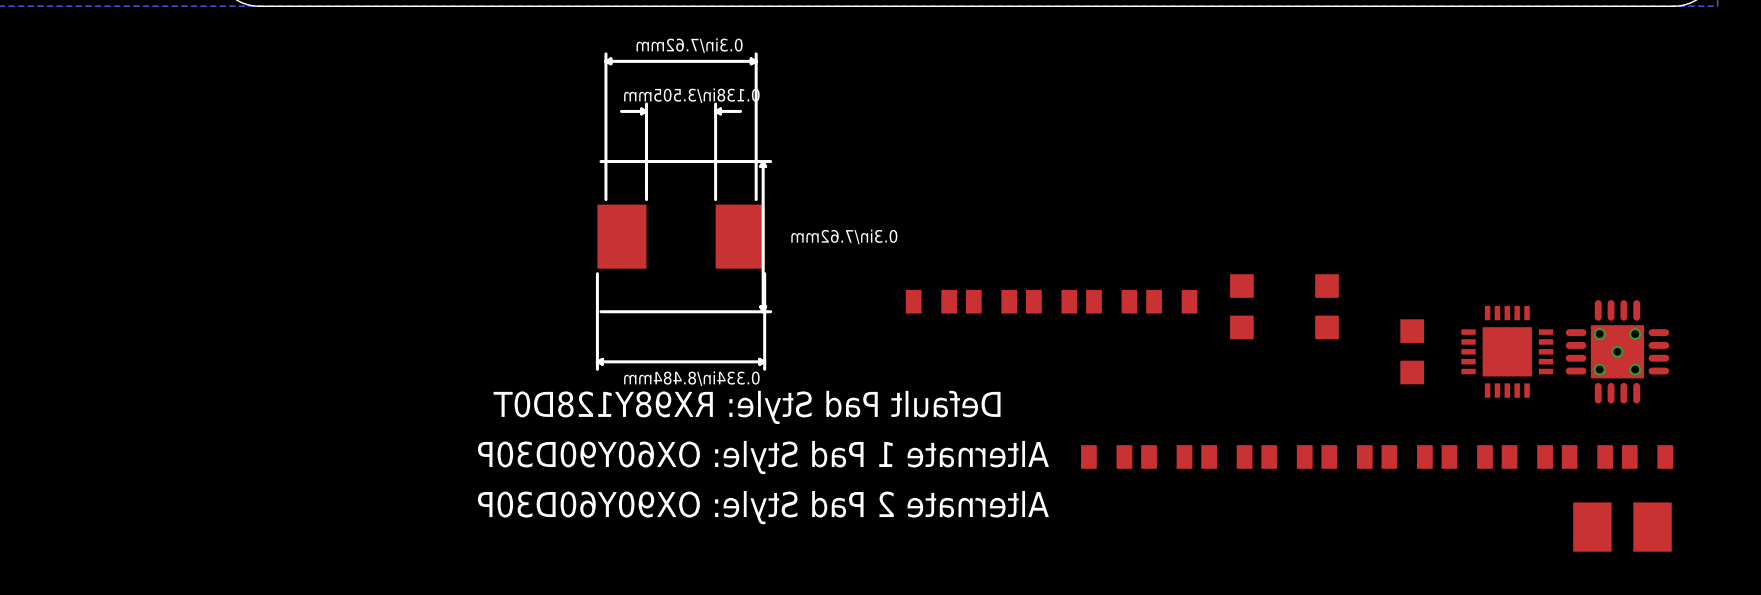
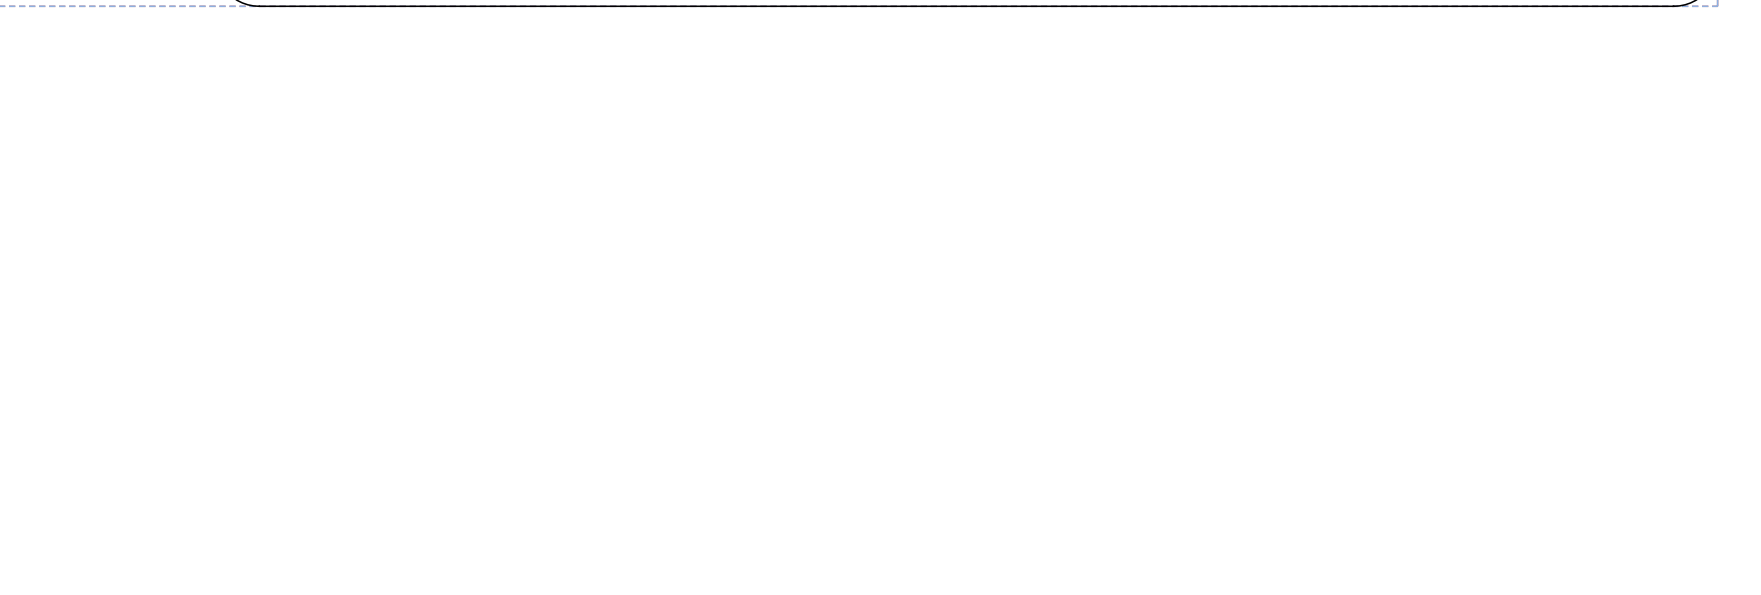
part: (684, 211) -> none
part: (931, 301) -> none
part: (991, 301) -> none
part: (1051, 301) -> none
part: (1111, 301) -> none
part: (1171, 301) -> none
part: (1241, 306) -> none
part: (1327, 306) -> none
part: (1412, 351) -> none
part: (1507, 351) -> none
part: (1617, 351) -> none
part: (1106, 456) -> none
part: (1166, 456) -> none
part: (1226, 456) -> none
part: (1286, 456) -> none
part: (1347, 456) -> none
part: (1407, 456) -> none
part: (1467, 456) -> none
part: (1527, 456) -> none
part: (1587, 456) -> none
part: (1647, 456) -> none
part: (1622, 527) -> none

